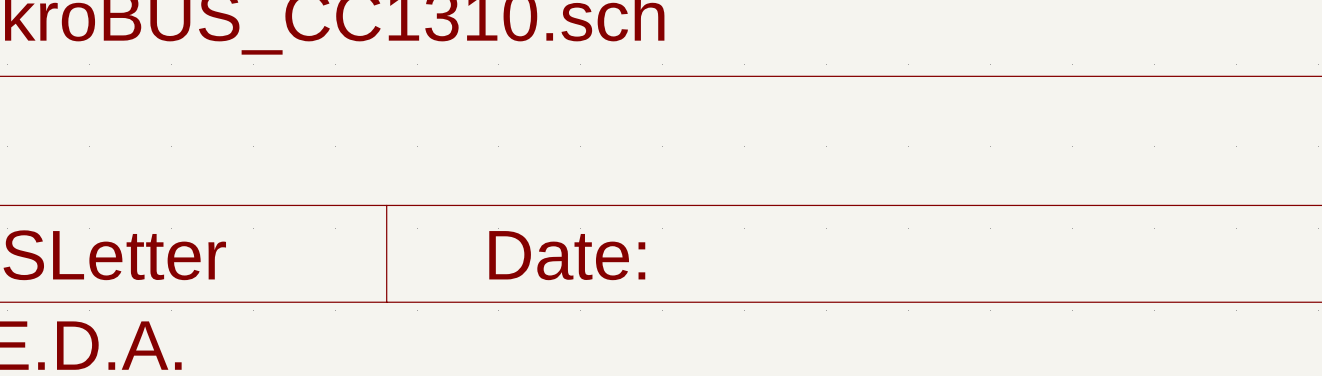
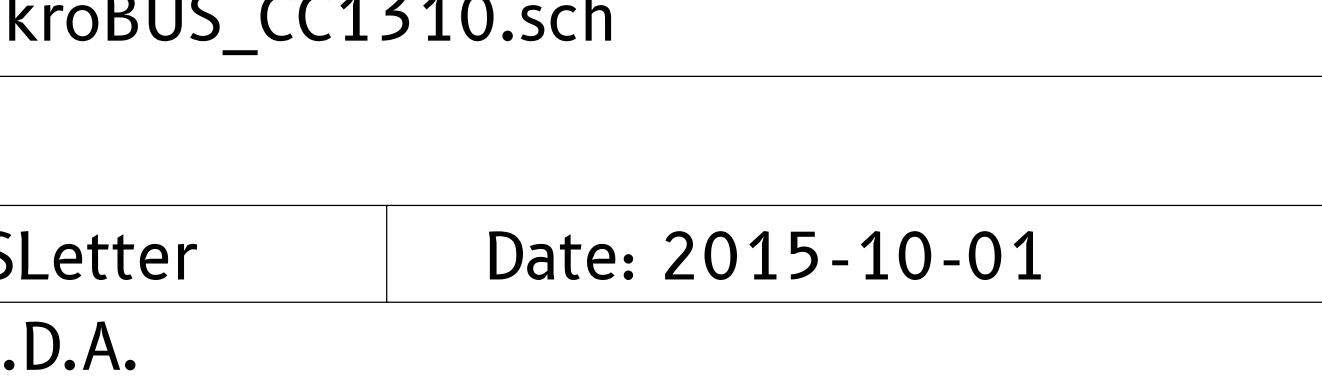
title block: Date: (567, 255) -> Date: 2015-10-01 (764, 255)

